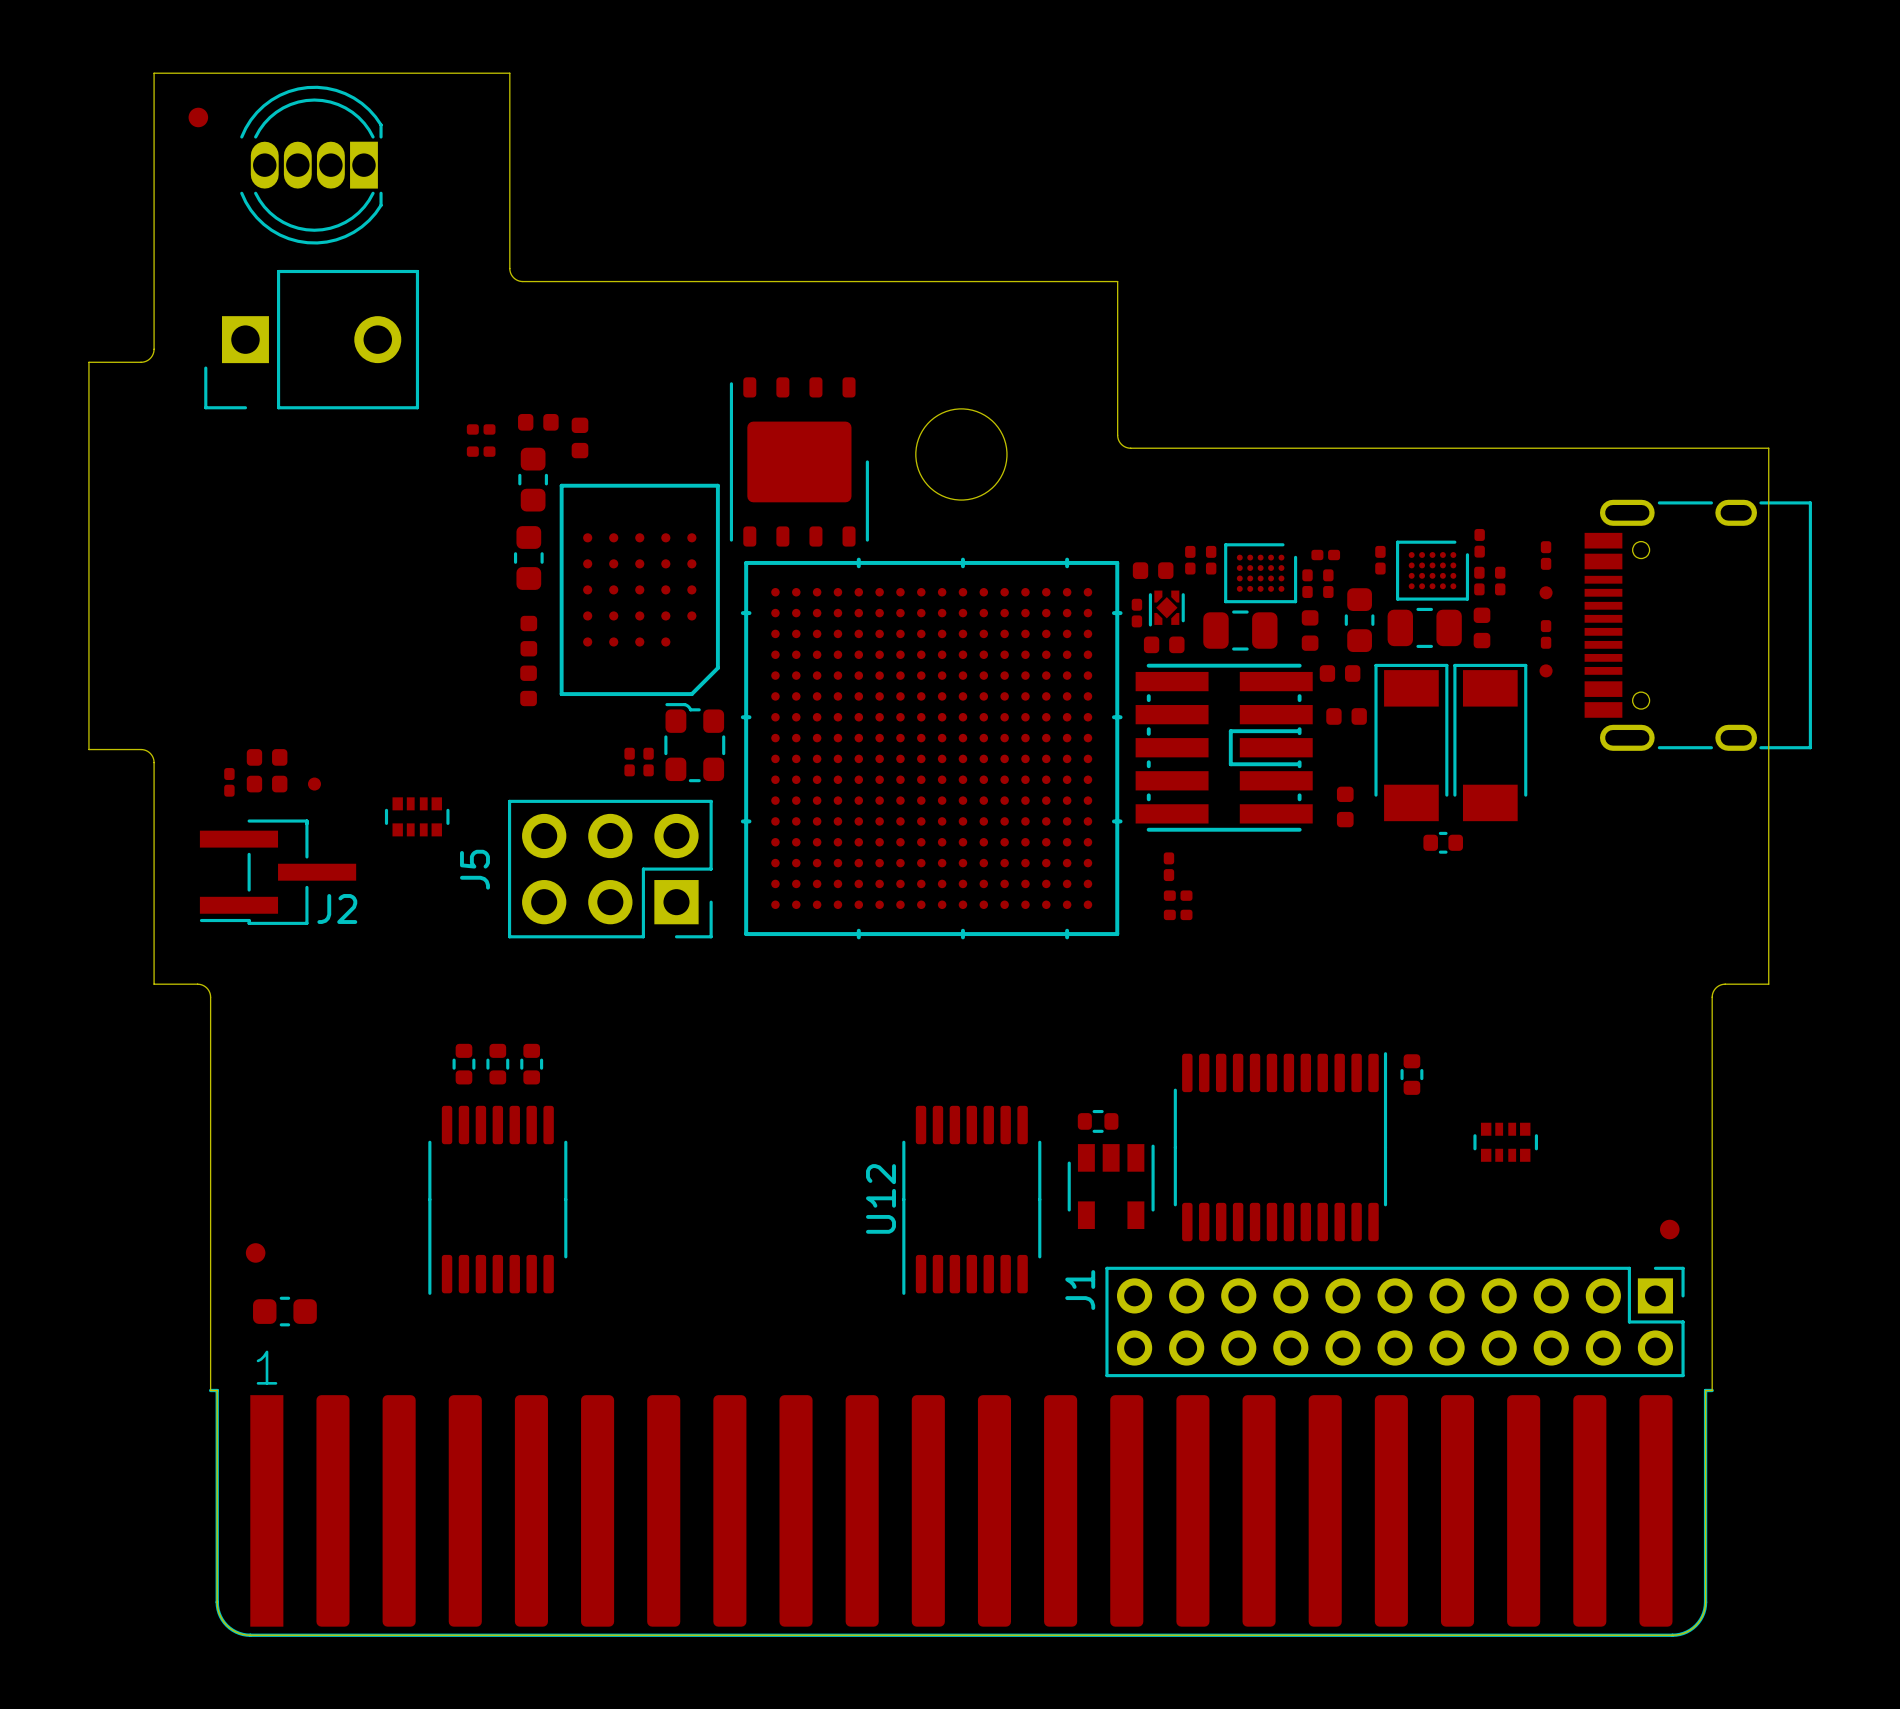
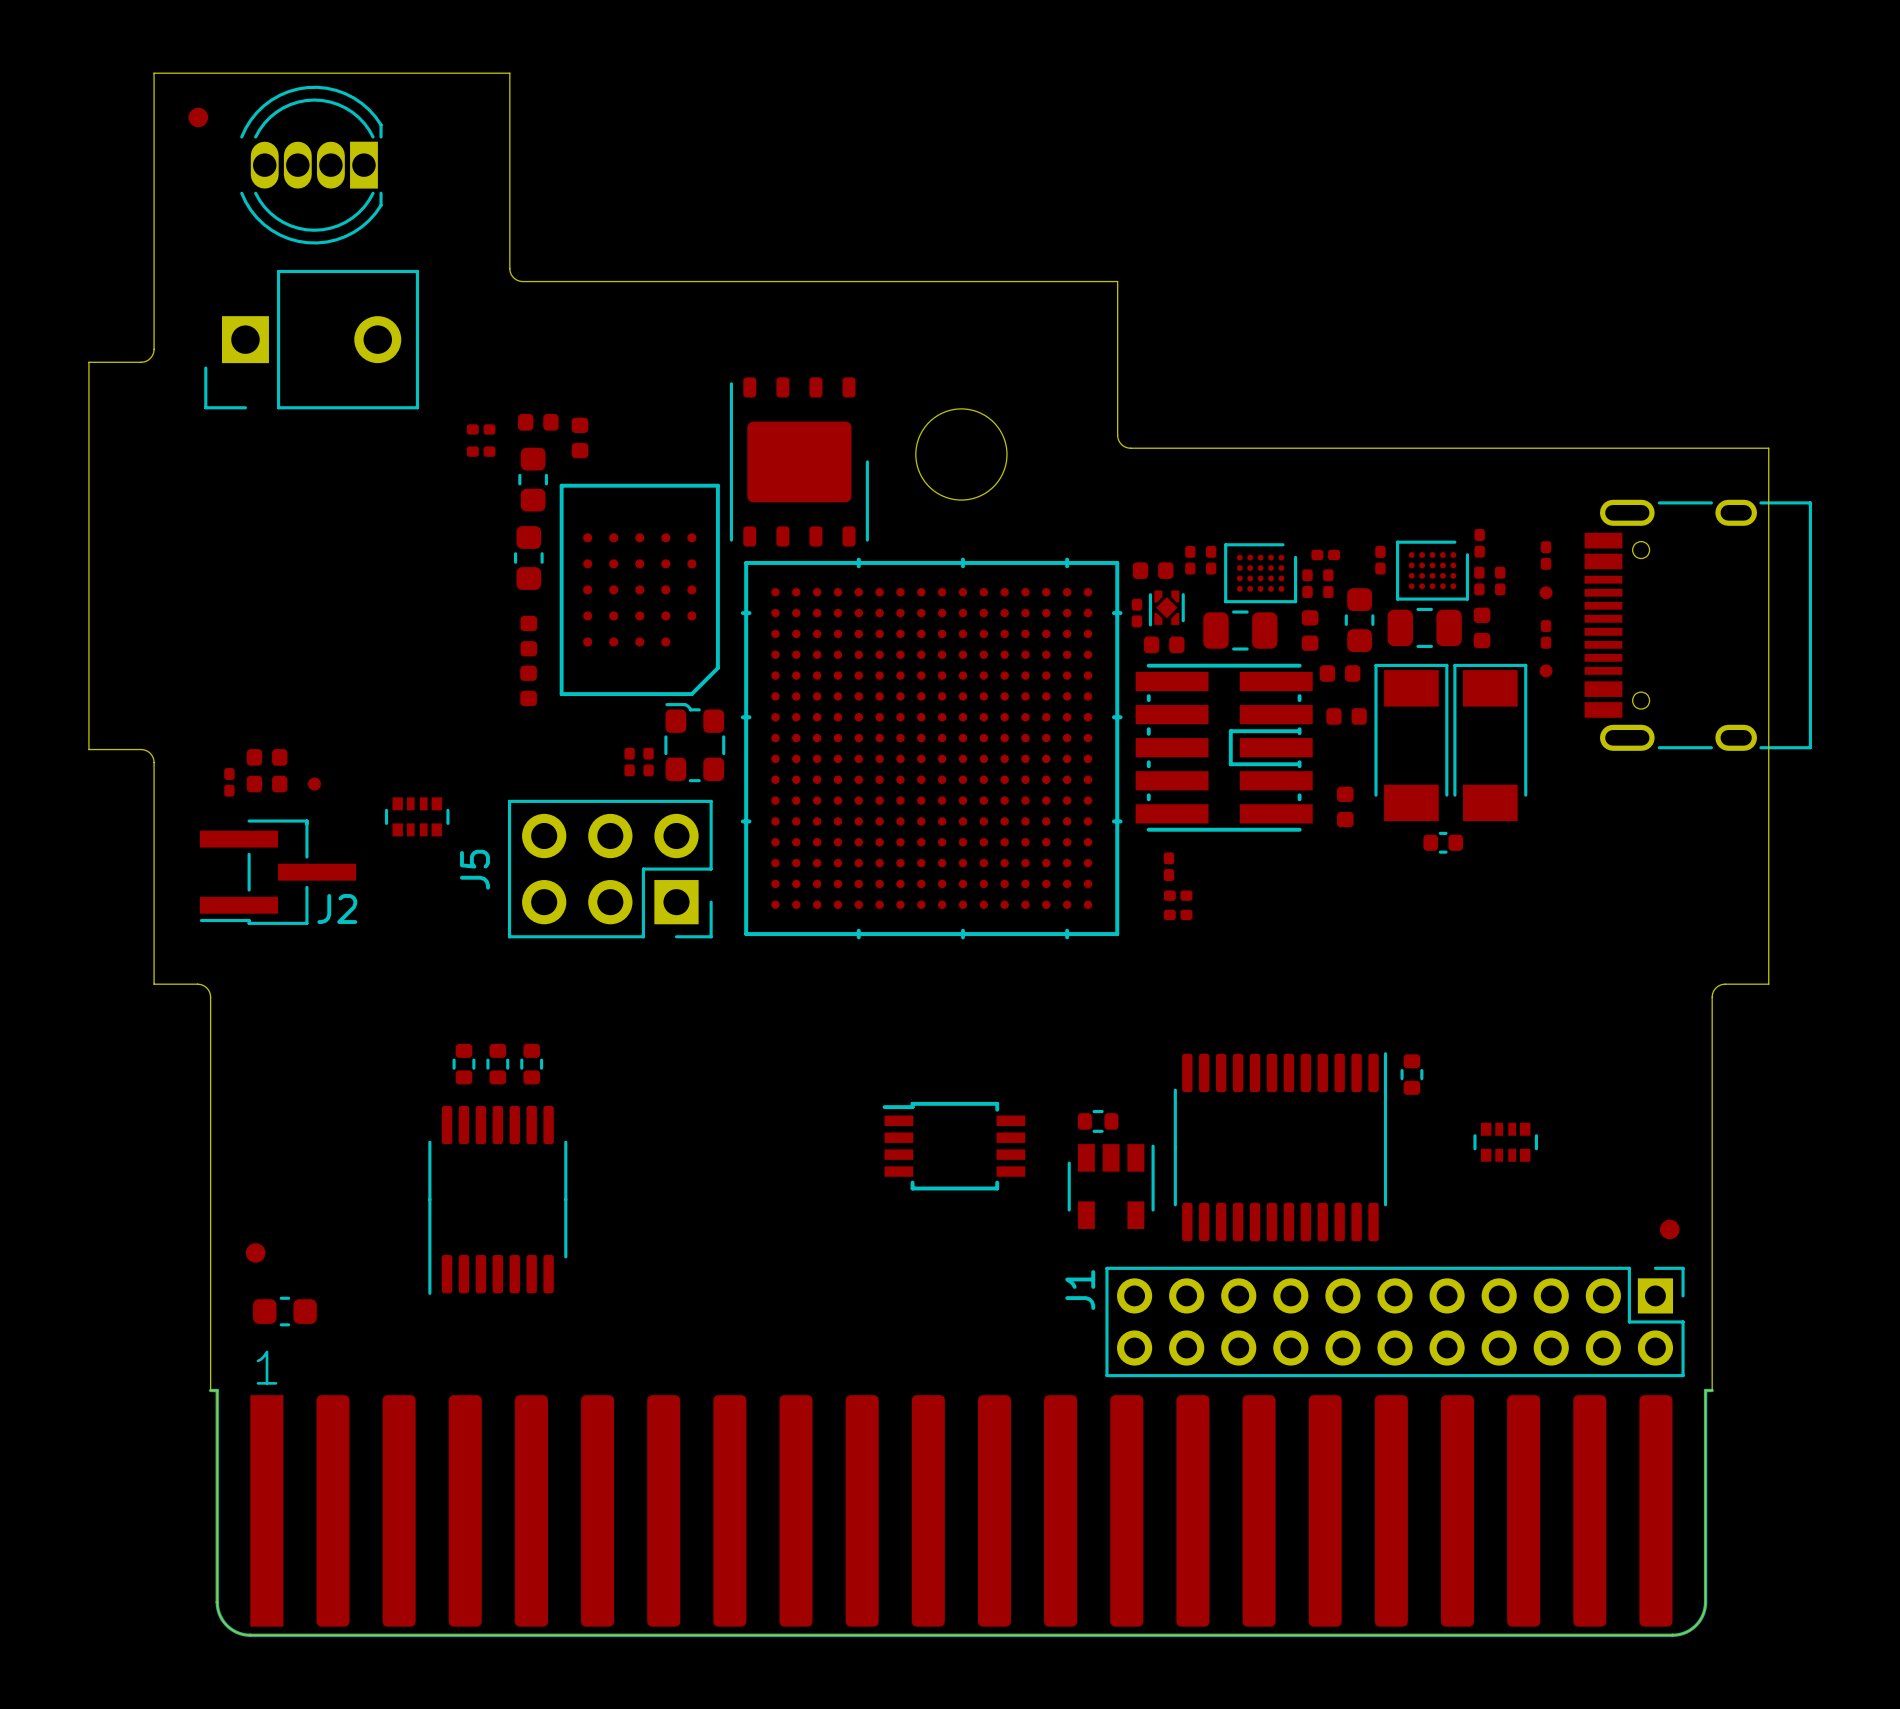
part: none -> (953, 1146)
U12: (971, 1200) -> none

